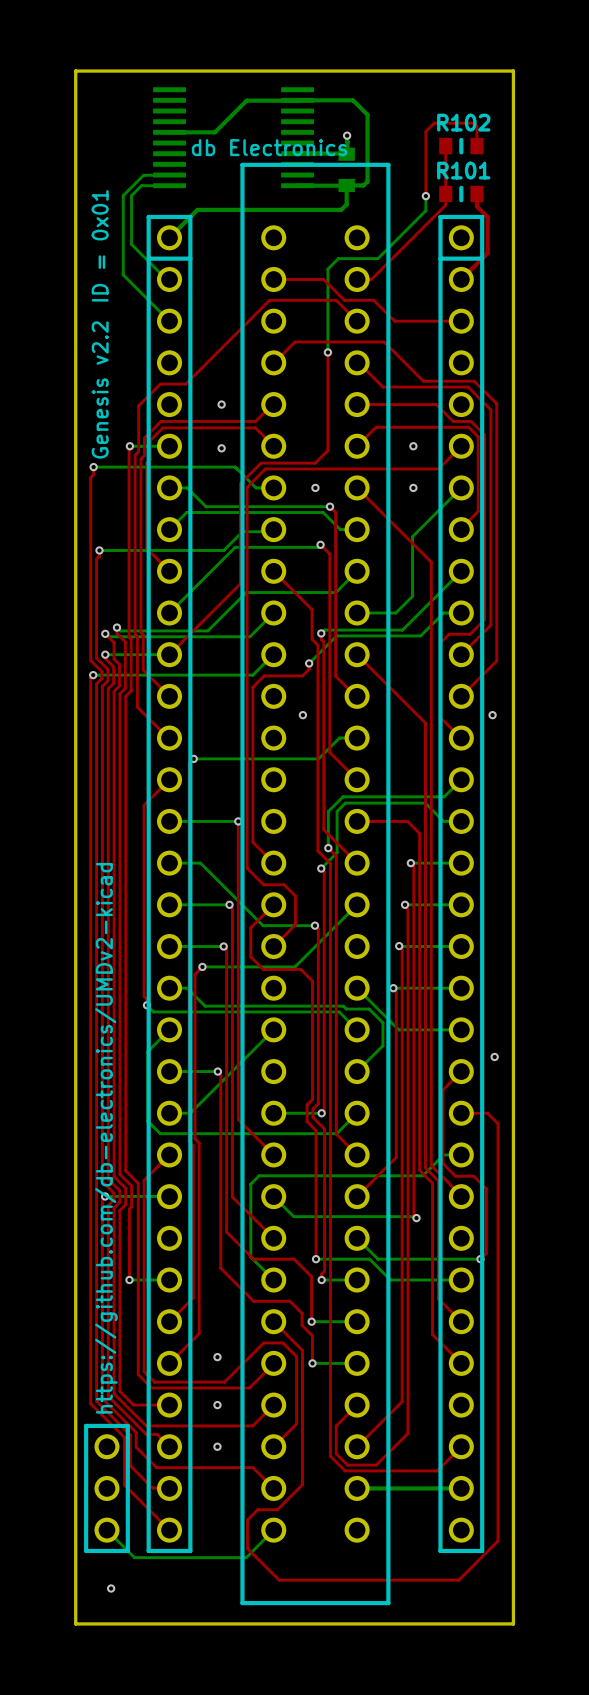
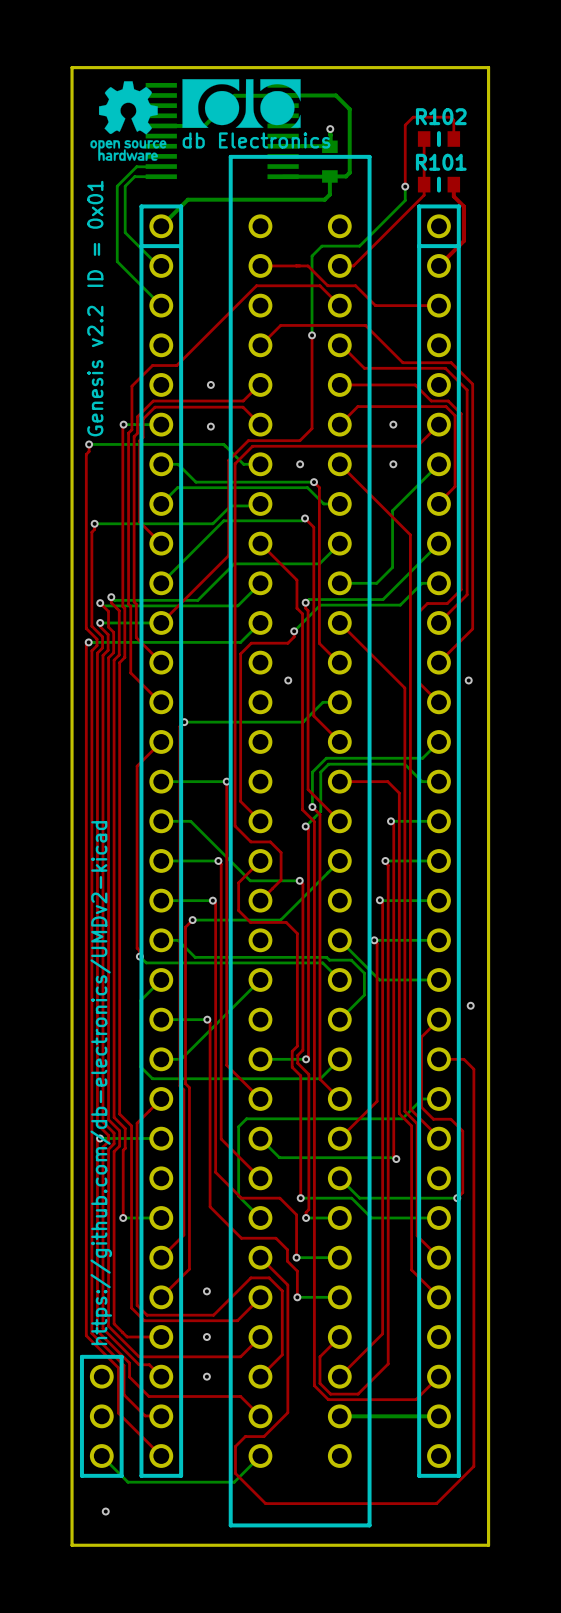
drawing: none -> [90, 79, 301, 161]

